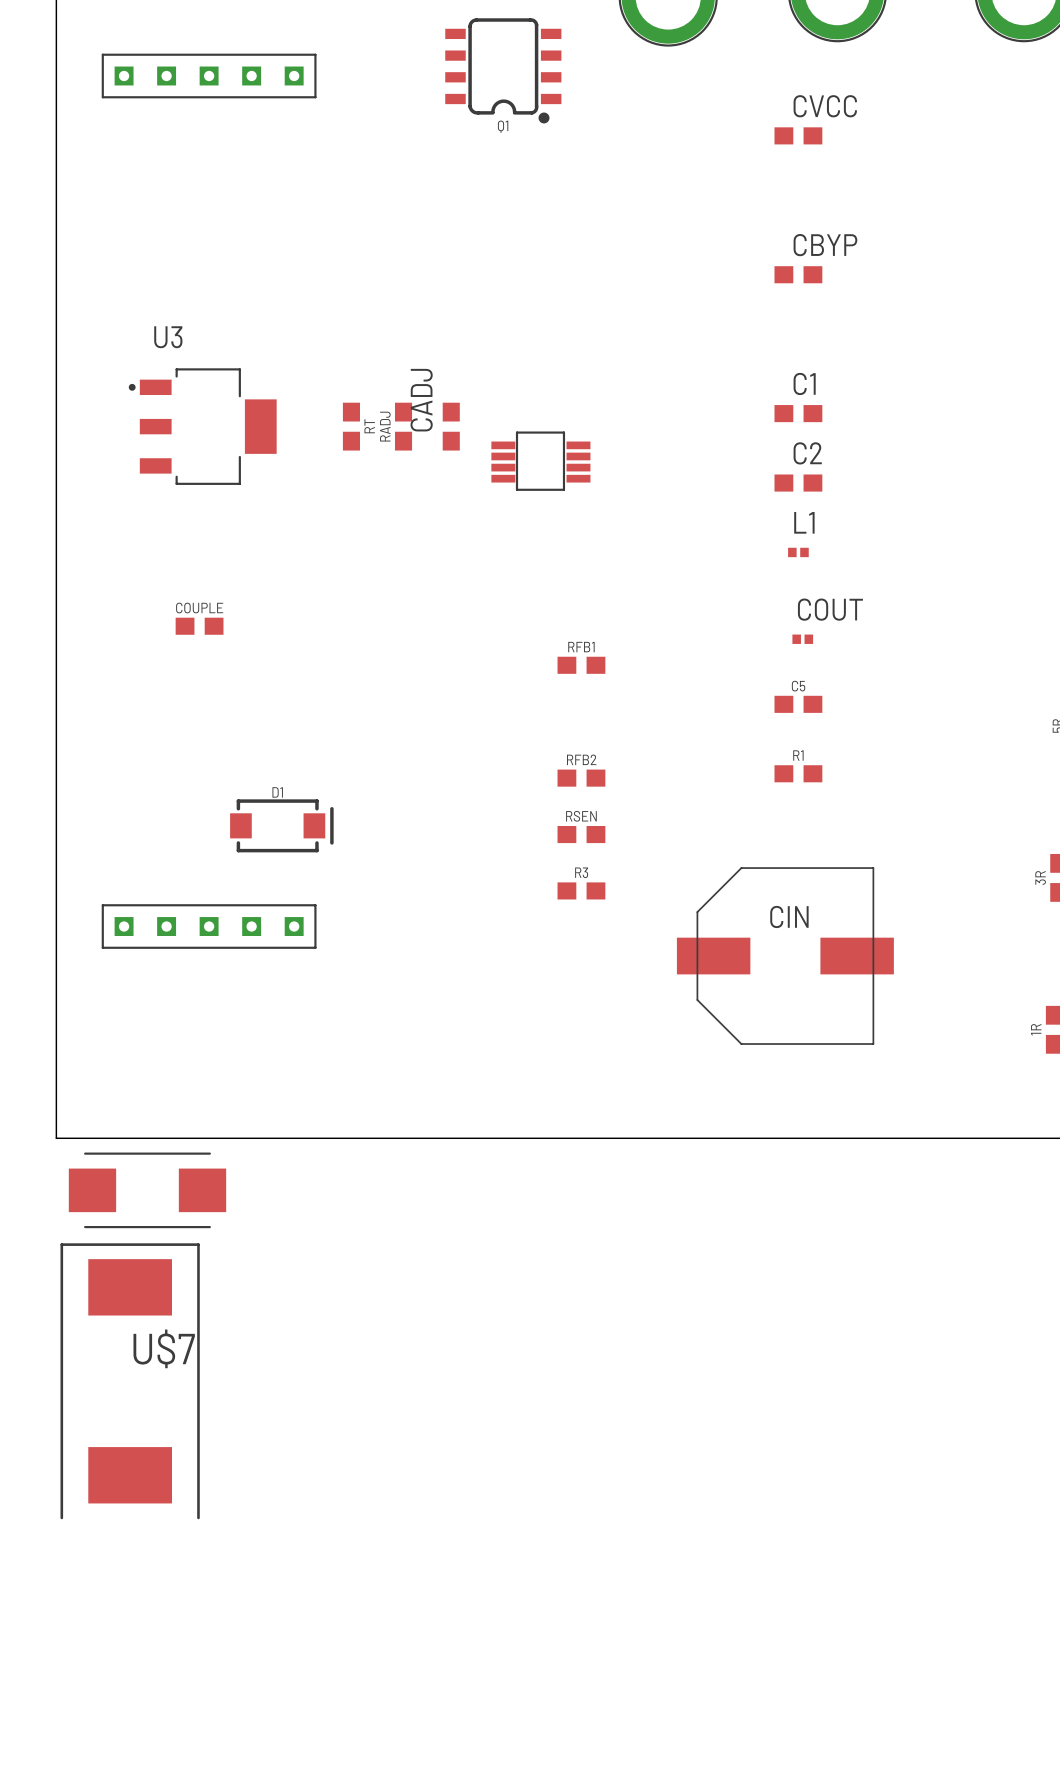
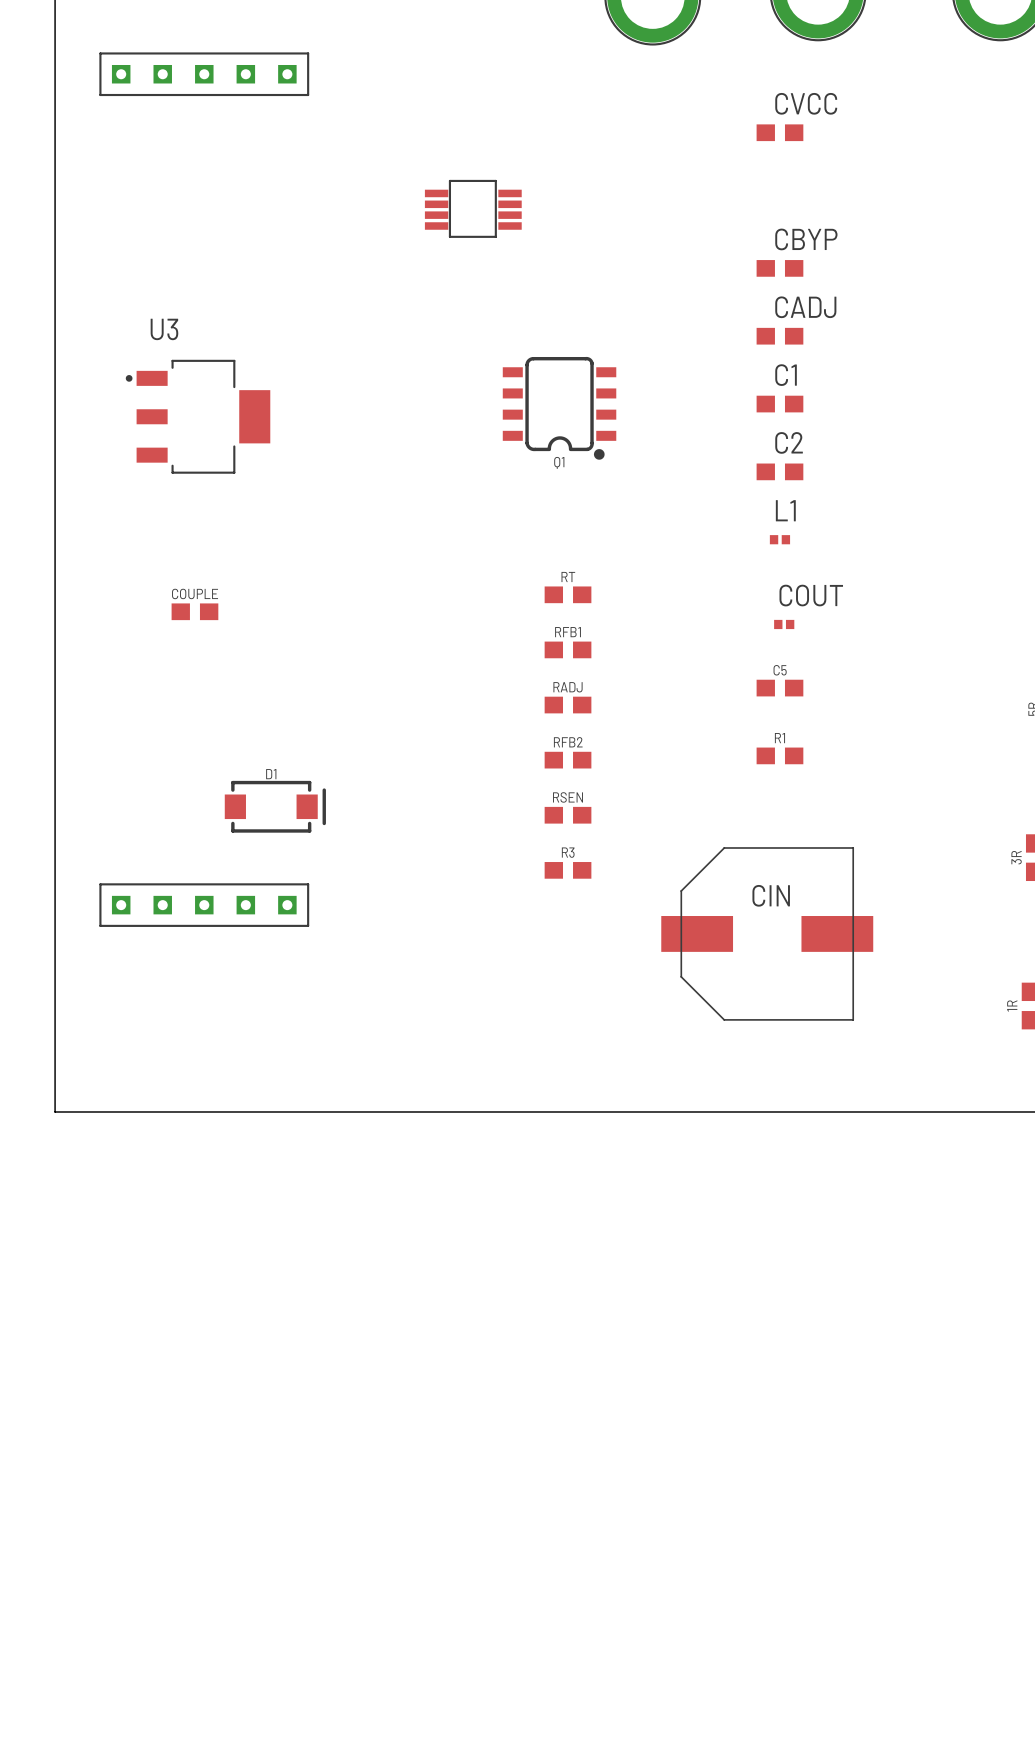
Q1 position: (503, 70) -> (559, 408)
RT rotation: 0° (351, 426) -> 90° clockwise (568, 594)
RT position: (351, 426) -> (568, 594)
RADJ rotation: 0° (403, 426) -> 90° clockwise (568, 705)
RADJ position: (403, 426) -> (568, 705)
CADJ rotation: 0° (451, 426) -> 90° clockwise (779, 336)
CADJ position: (451, 426) -> (779, 336)
part position: (540, 461) -> (473, 208)
part: (147, 1190) -> none
U$7: (130, 1381) -> none

